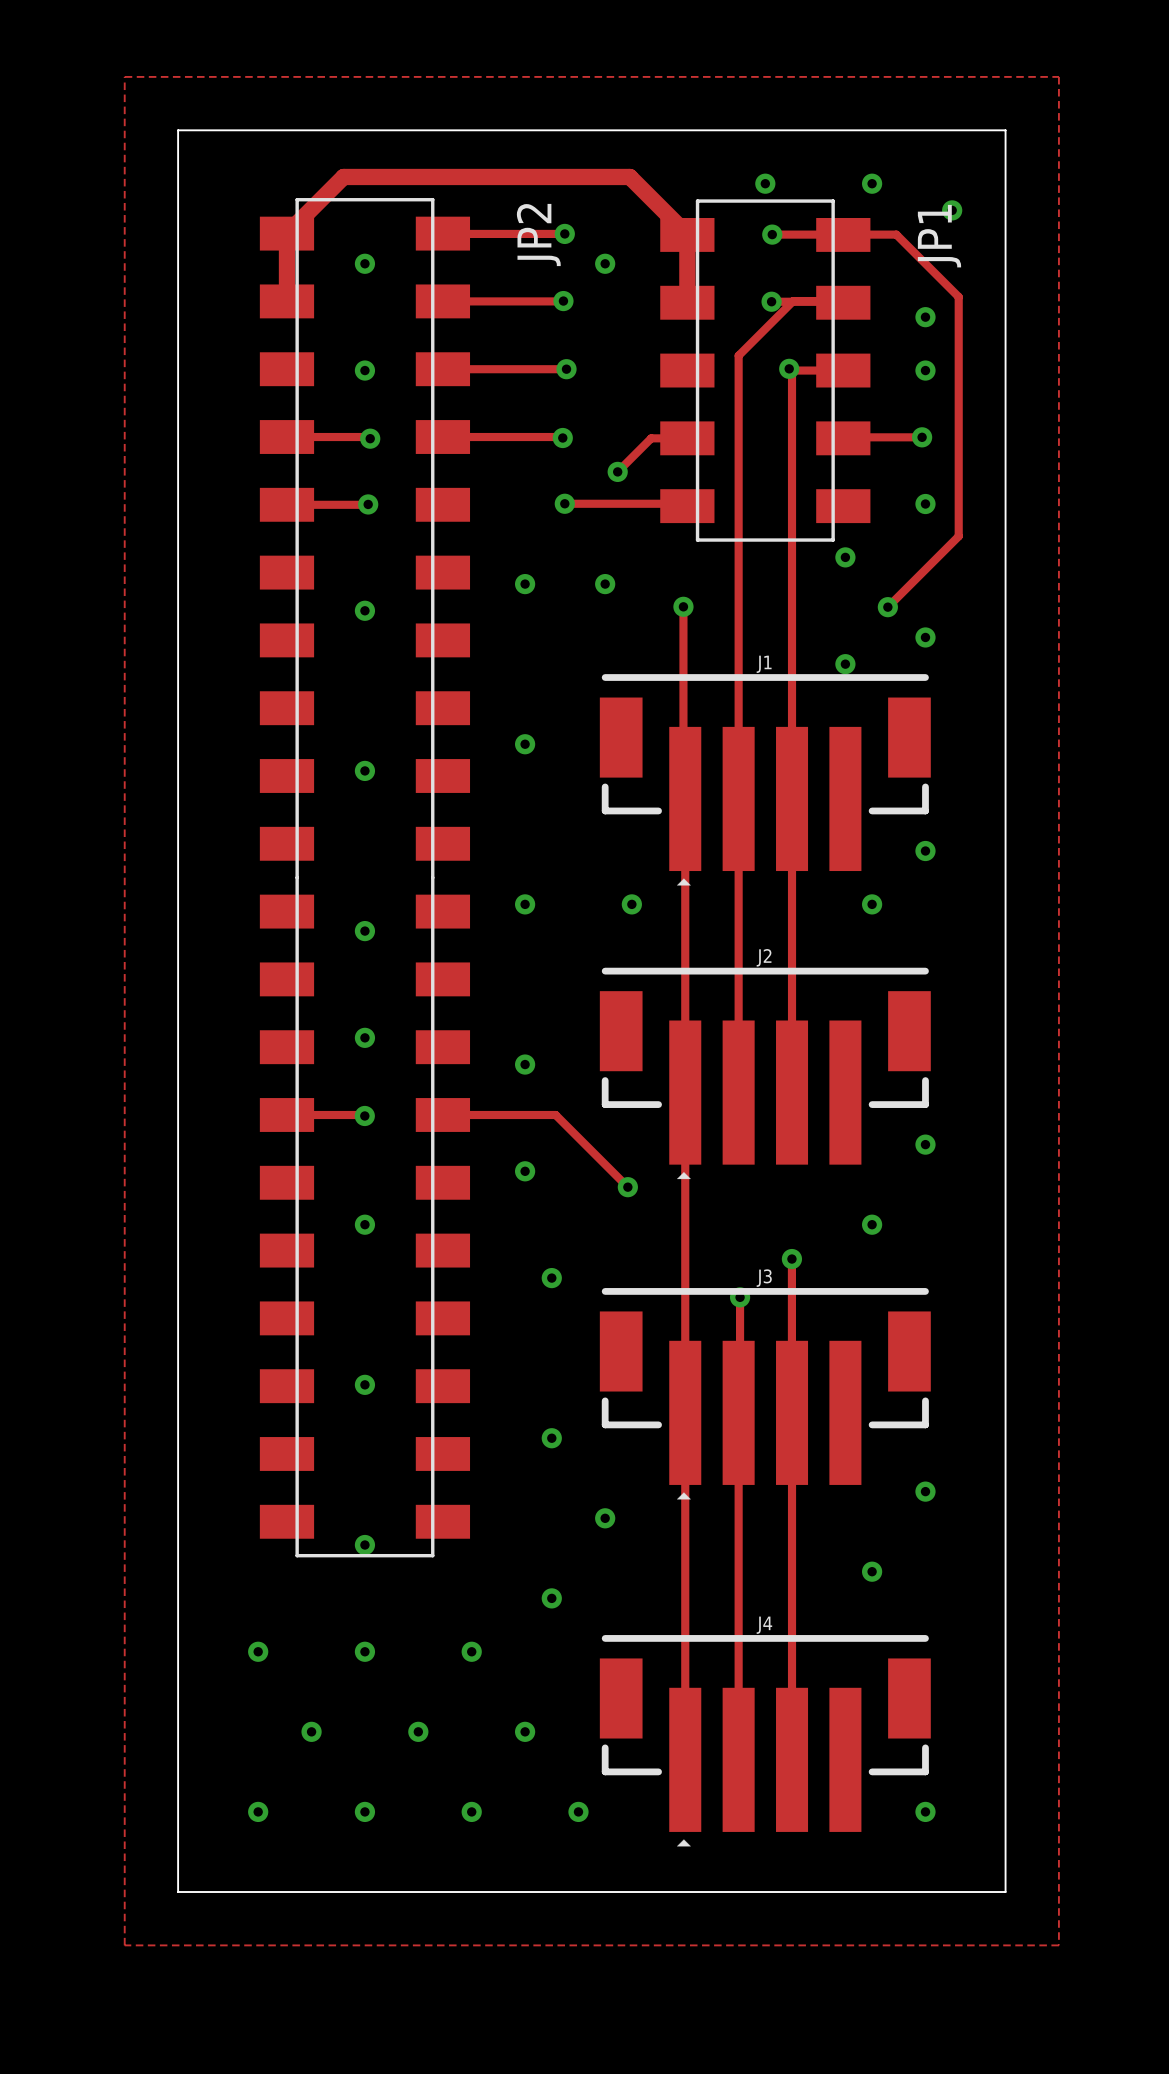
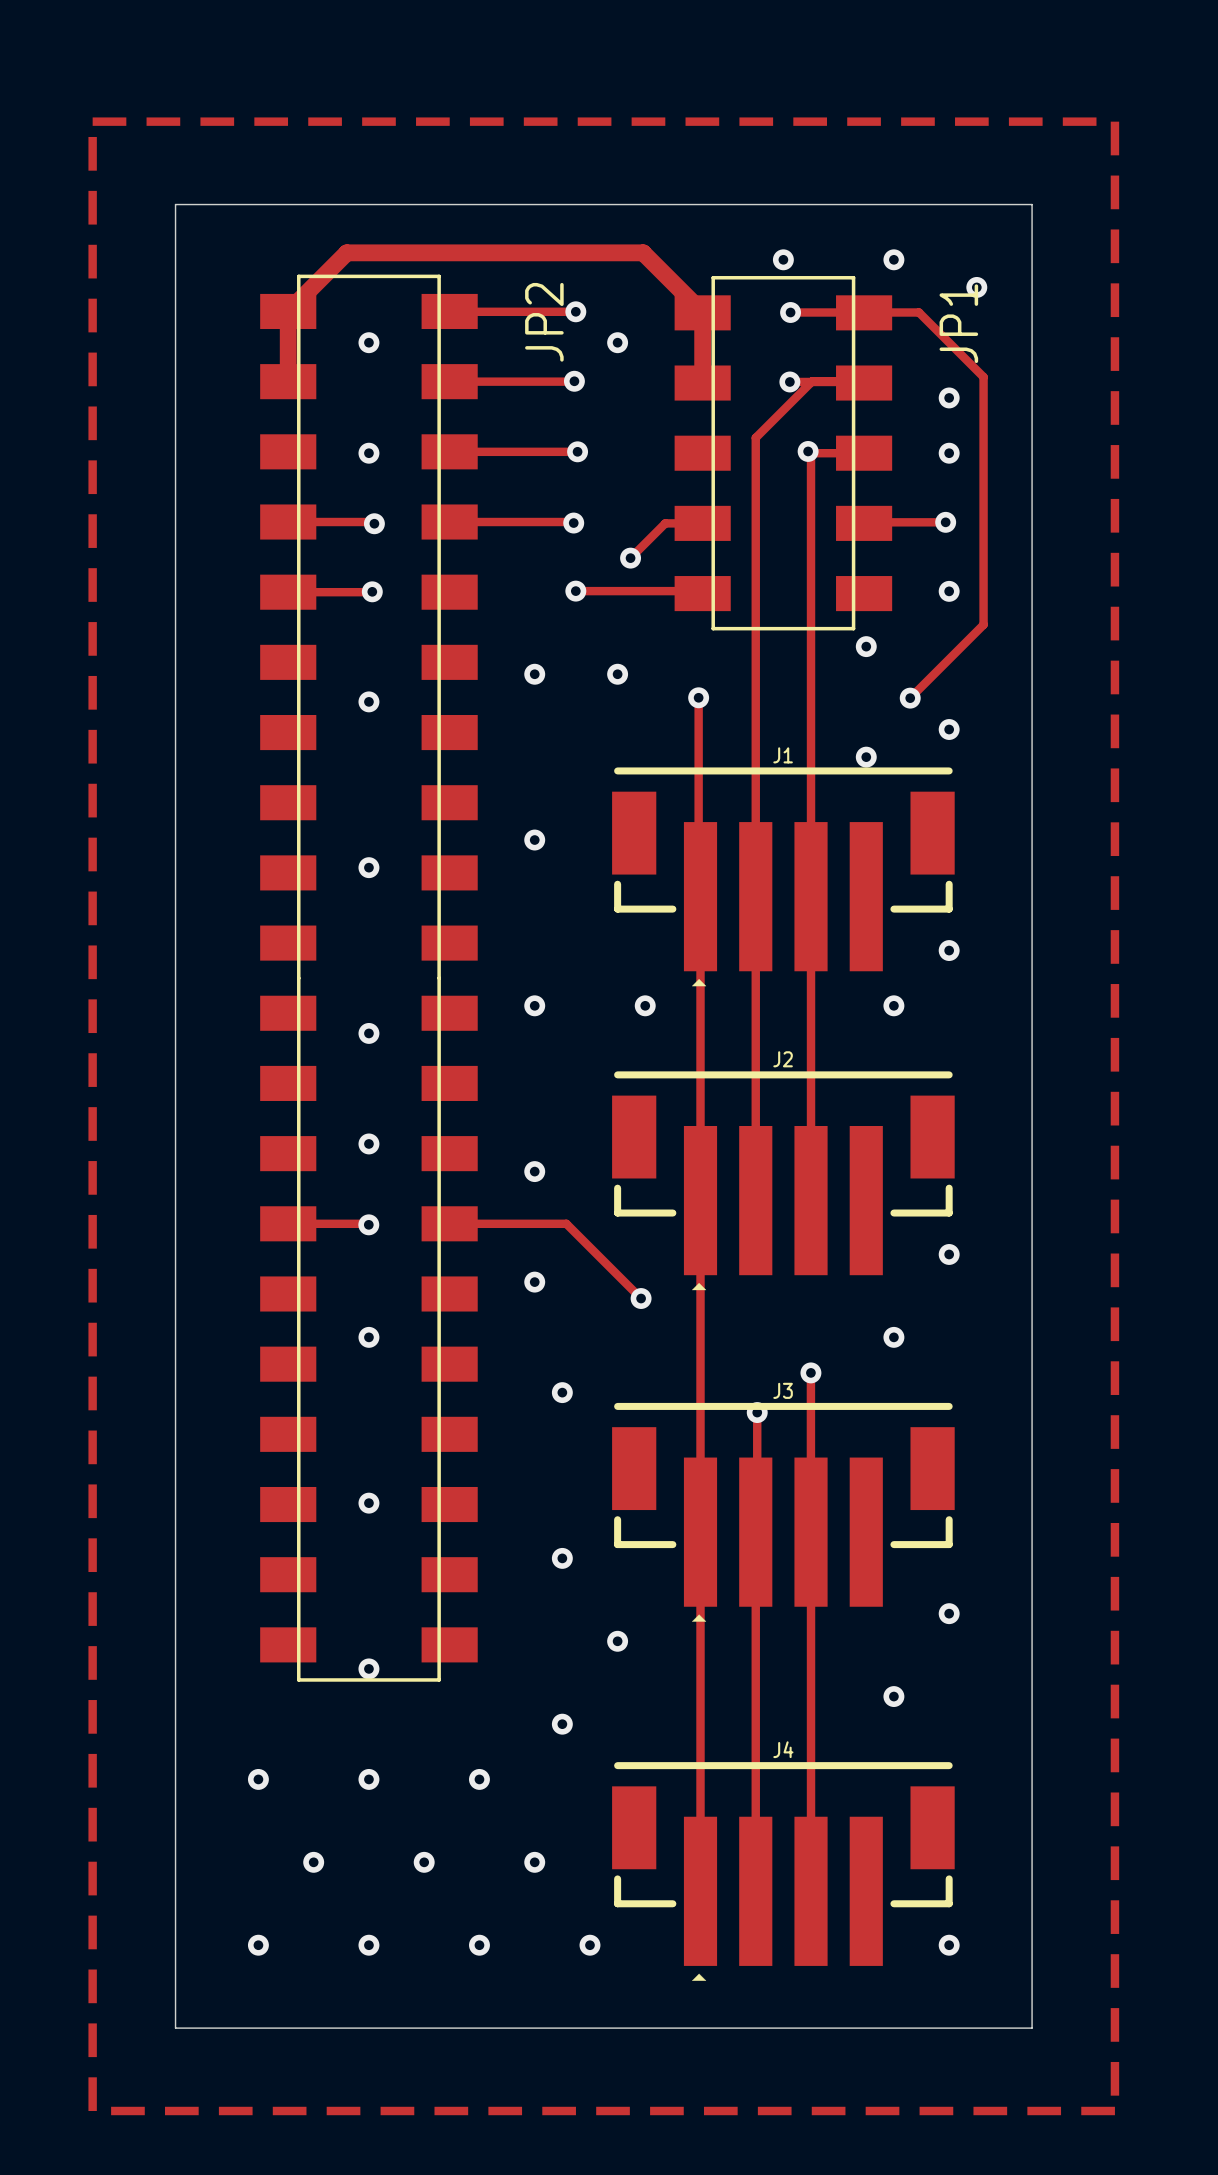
track: none -> (92, 121) (1114, 121) (1114, 2110) (92, 2110) (92, 121)
zone outline: (124, 76) (1058, 76) (1058, 1945) (124, 1945) (124, 76) -> none

